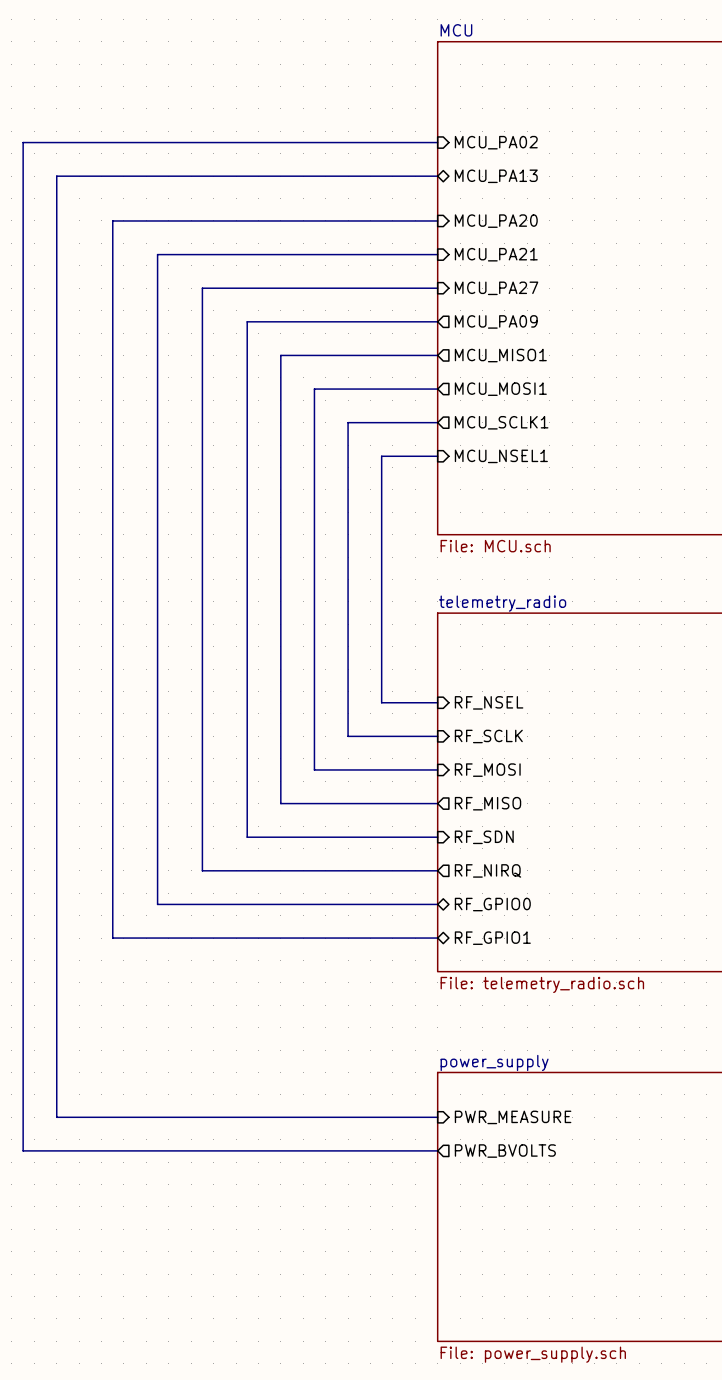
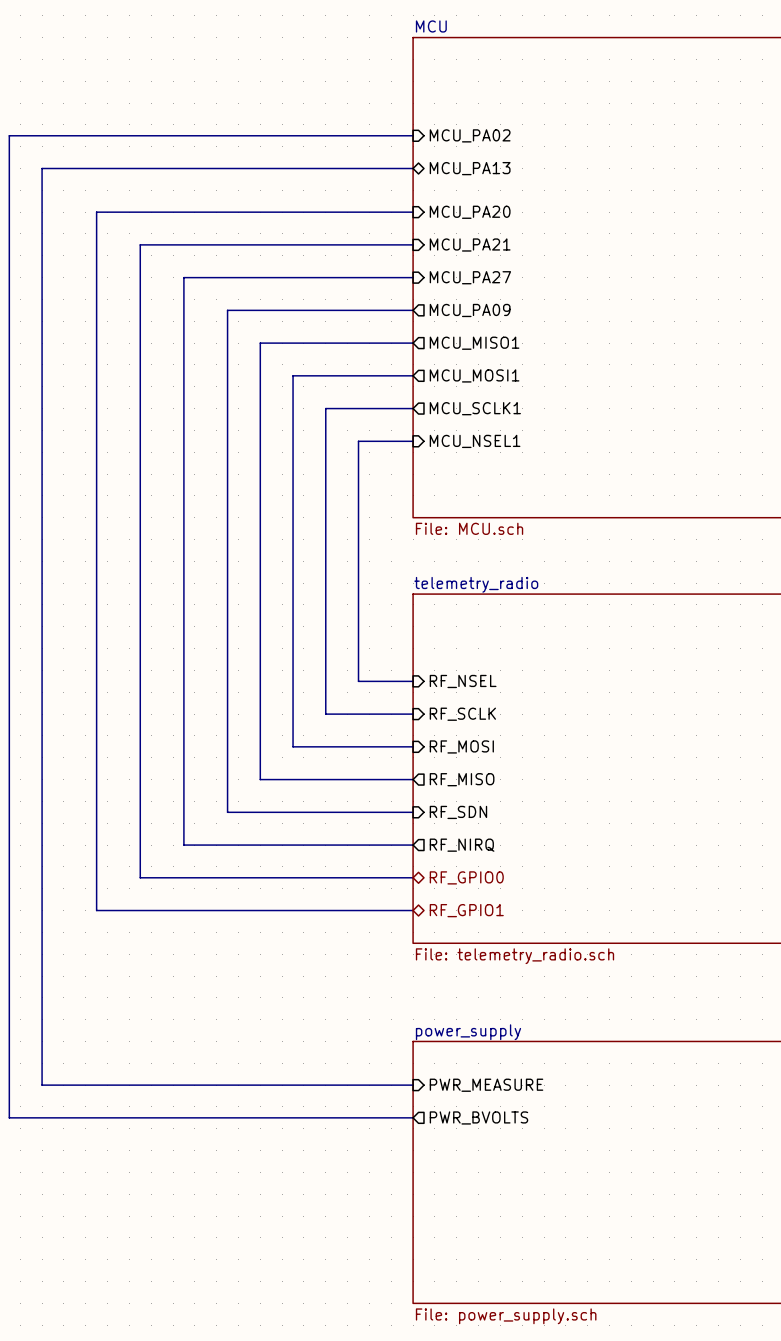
sheet pin: RF_GPIO0 (492, 904) -> none
hierarchical label: none -> RF_GPIO0 (466, 877)
sheet pin: RF_GPIO1 (492, 938) -> none
hierarchical label: none -> RF_GPIO1 (466, 910)

